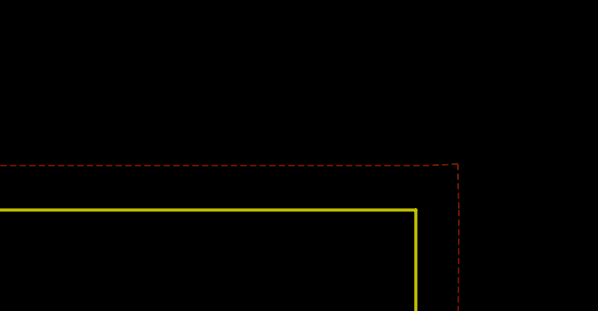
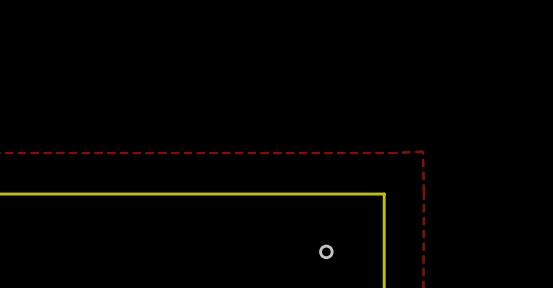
via: none -> (326, 251)

